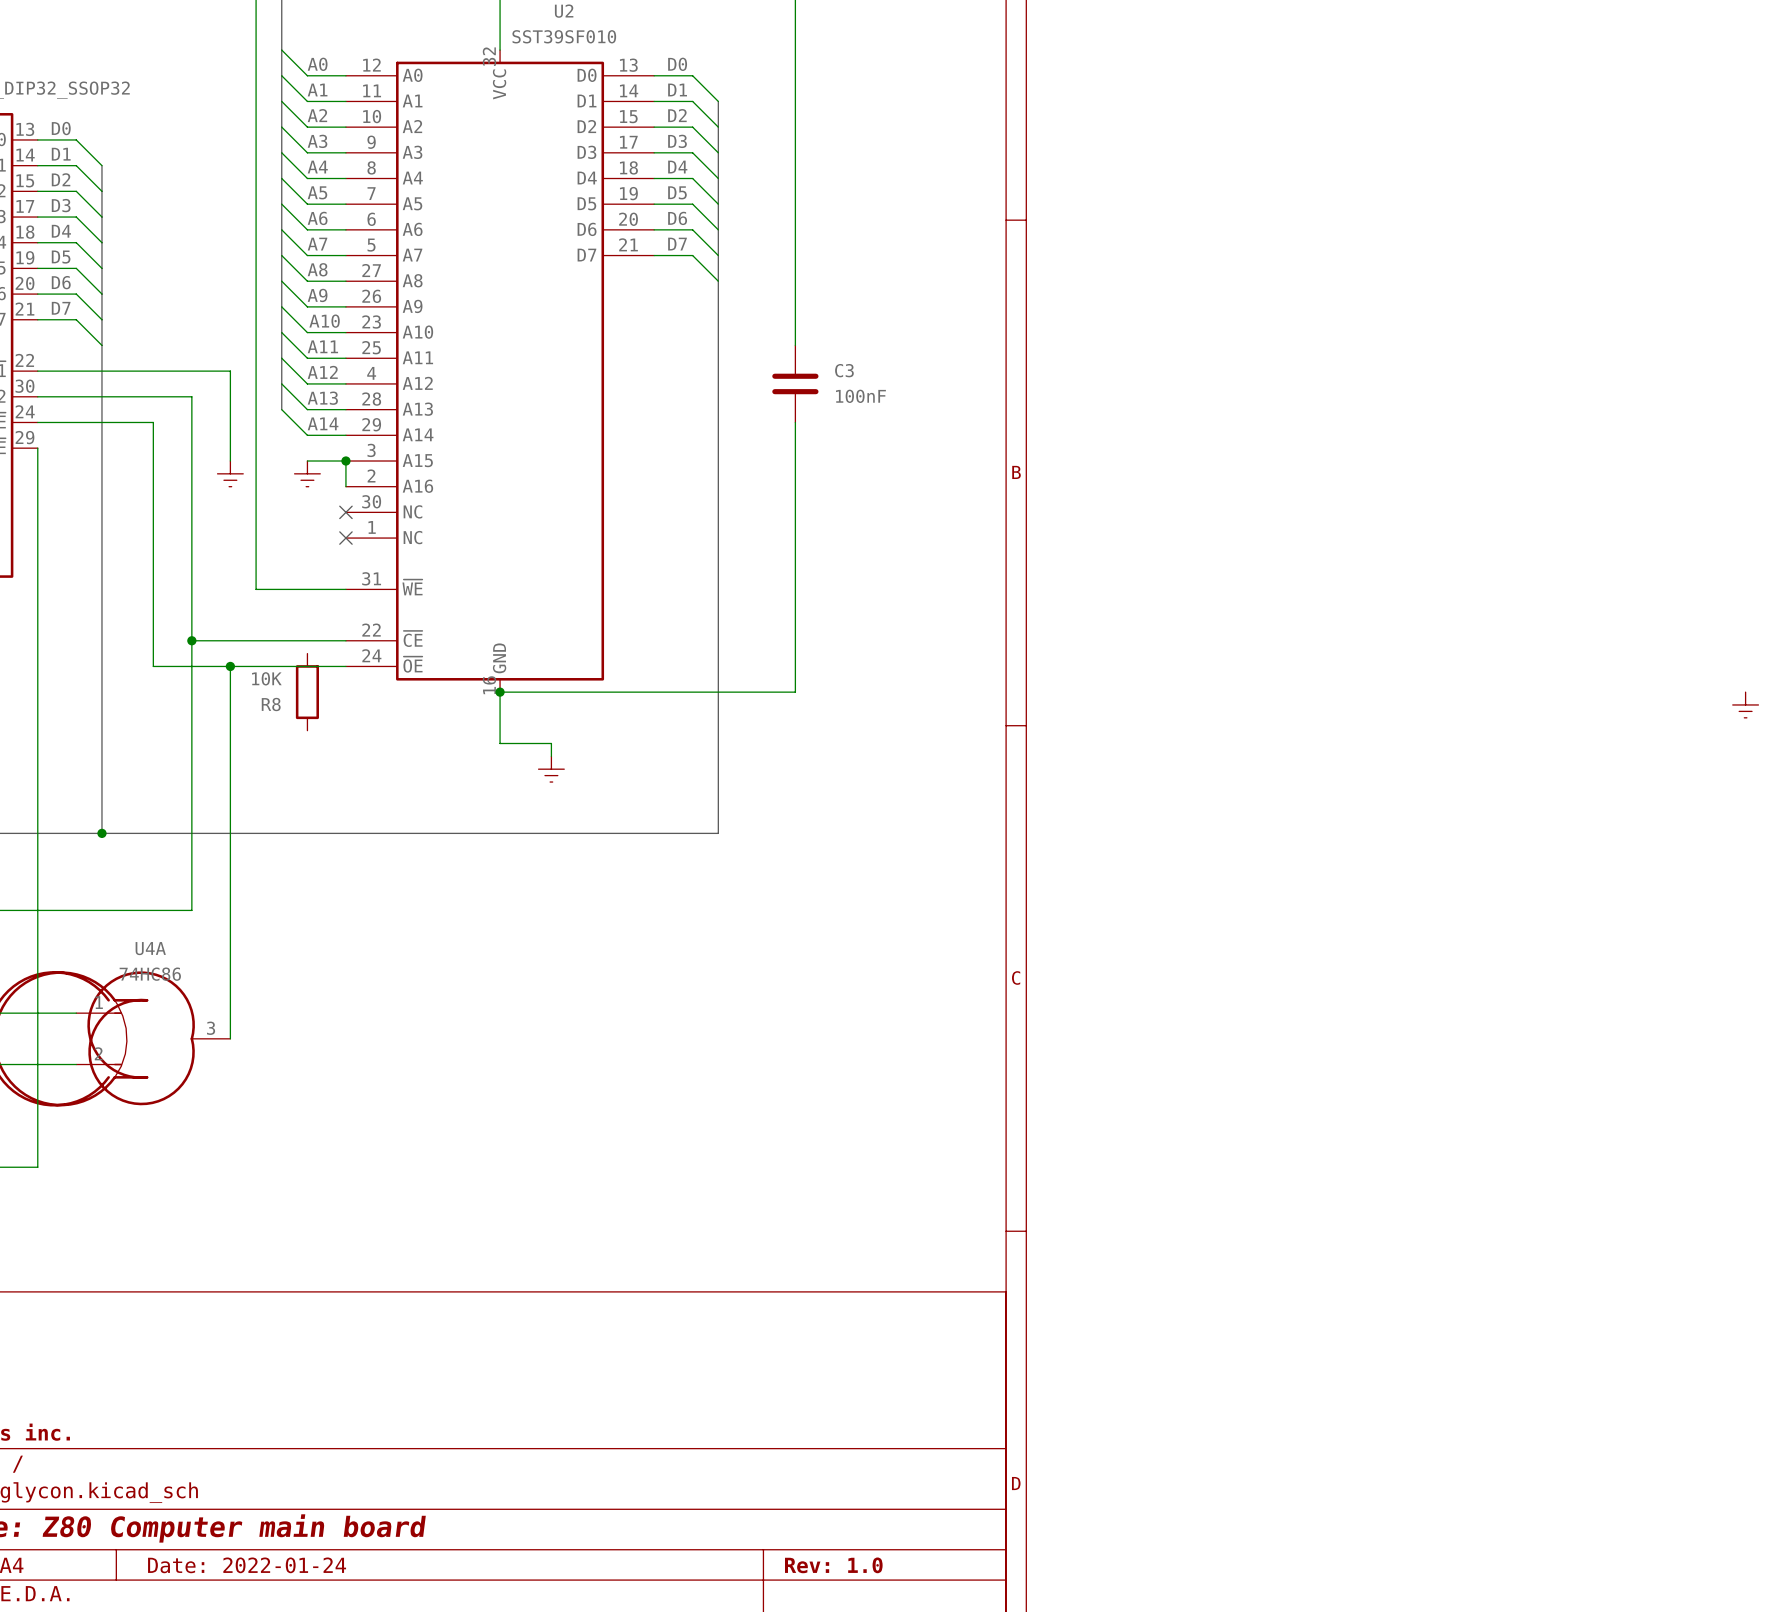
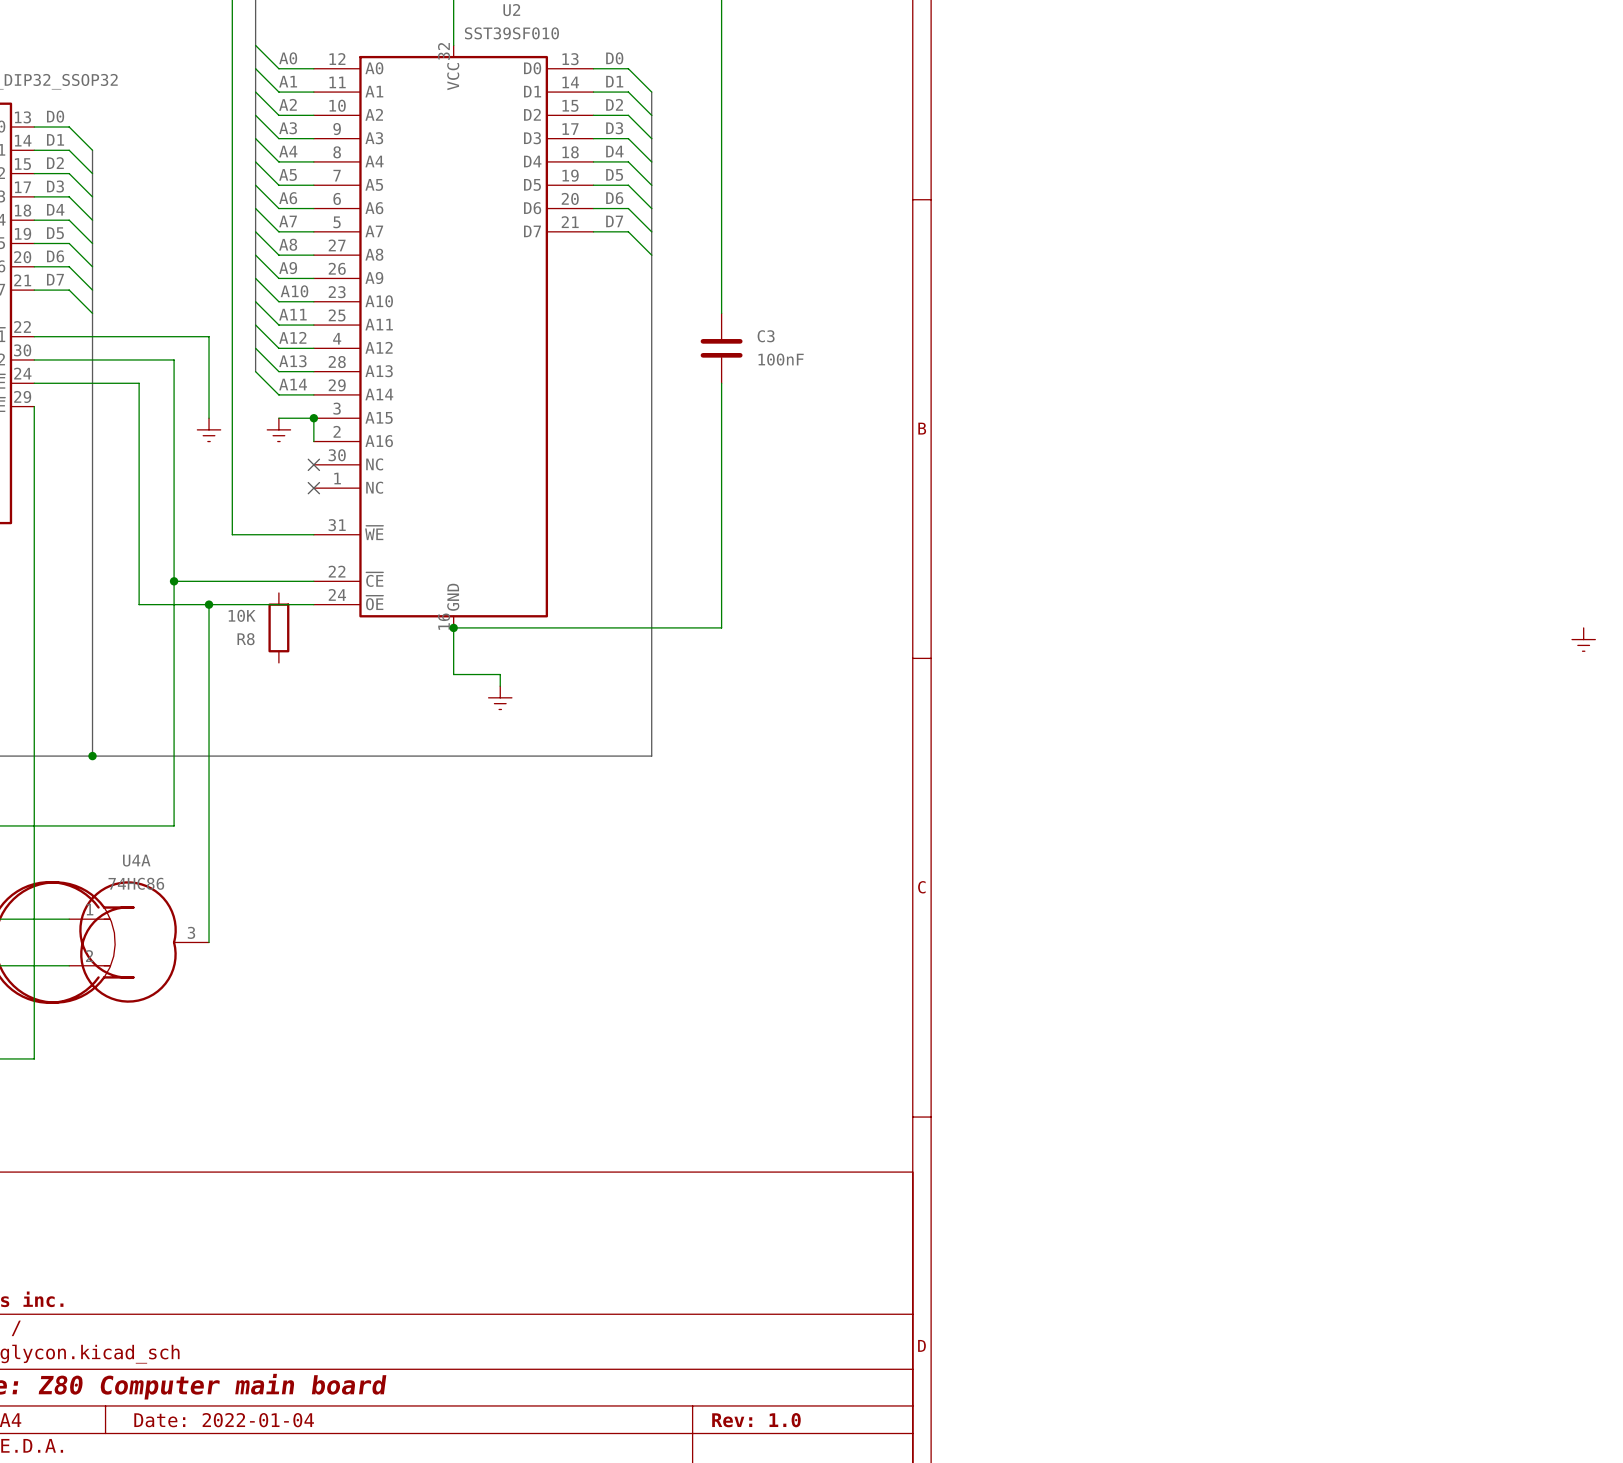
title block: Date: 2022-01-24 (247, 1565) -> Date: 2022-01-04 (224, 1420)

